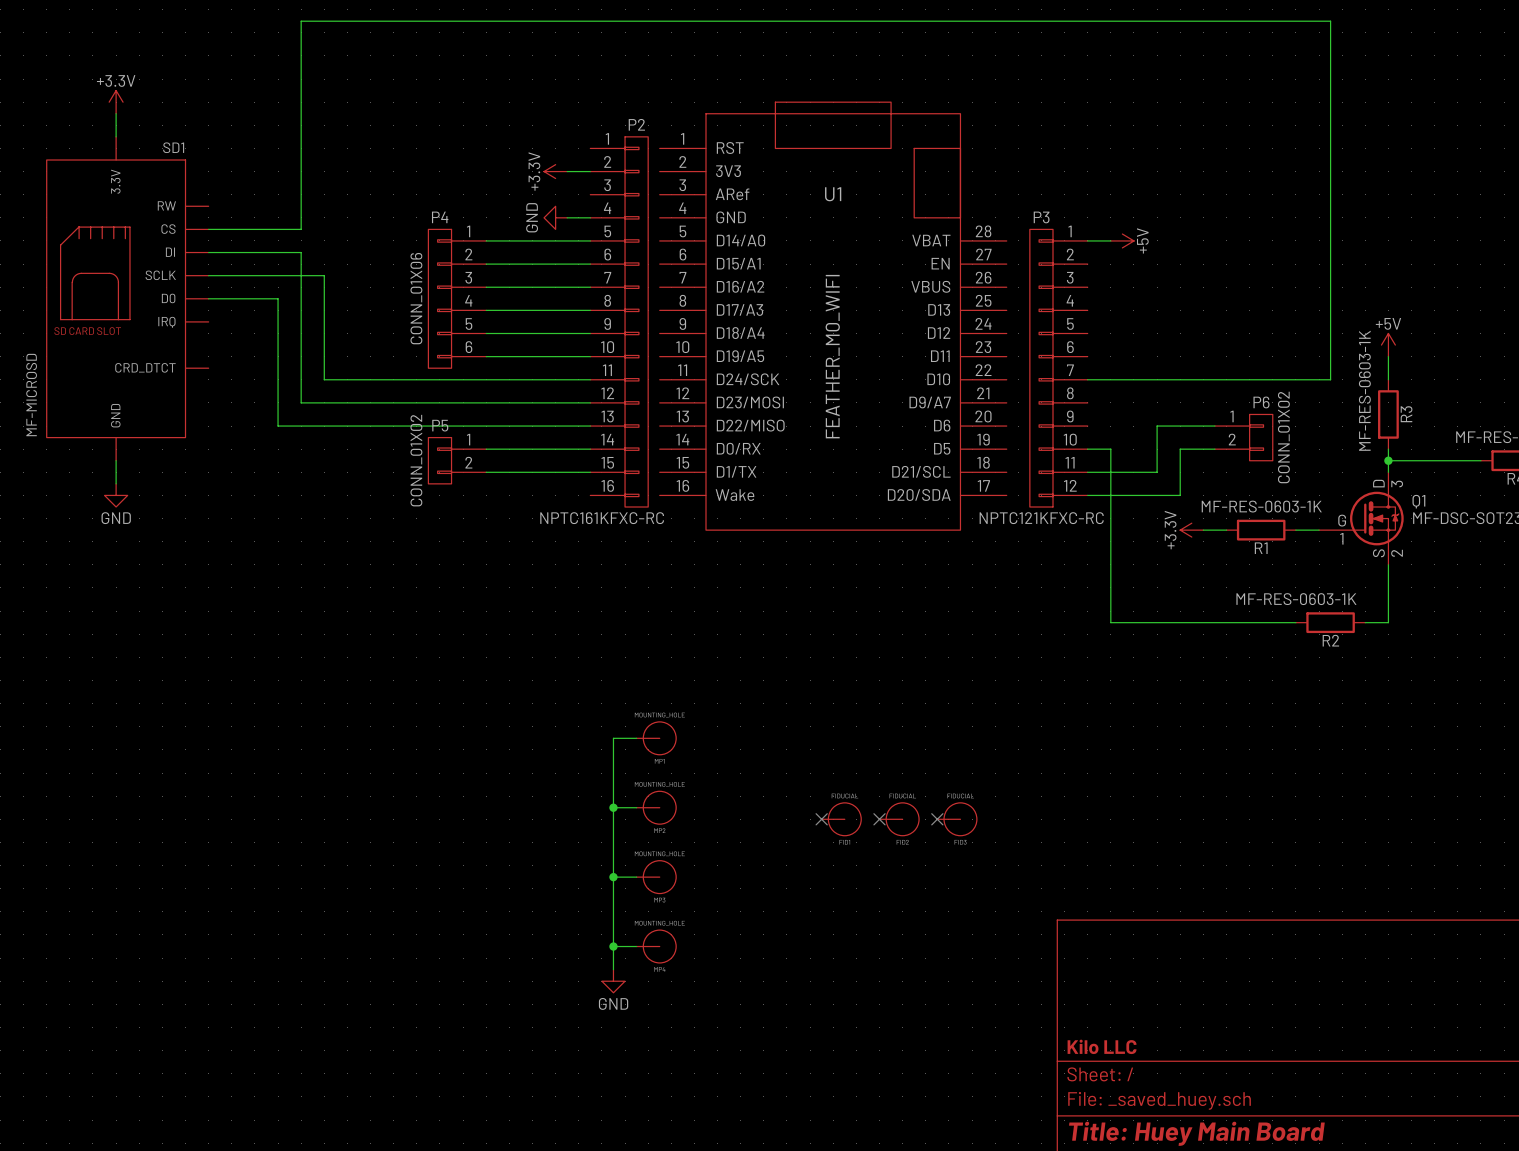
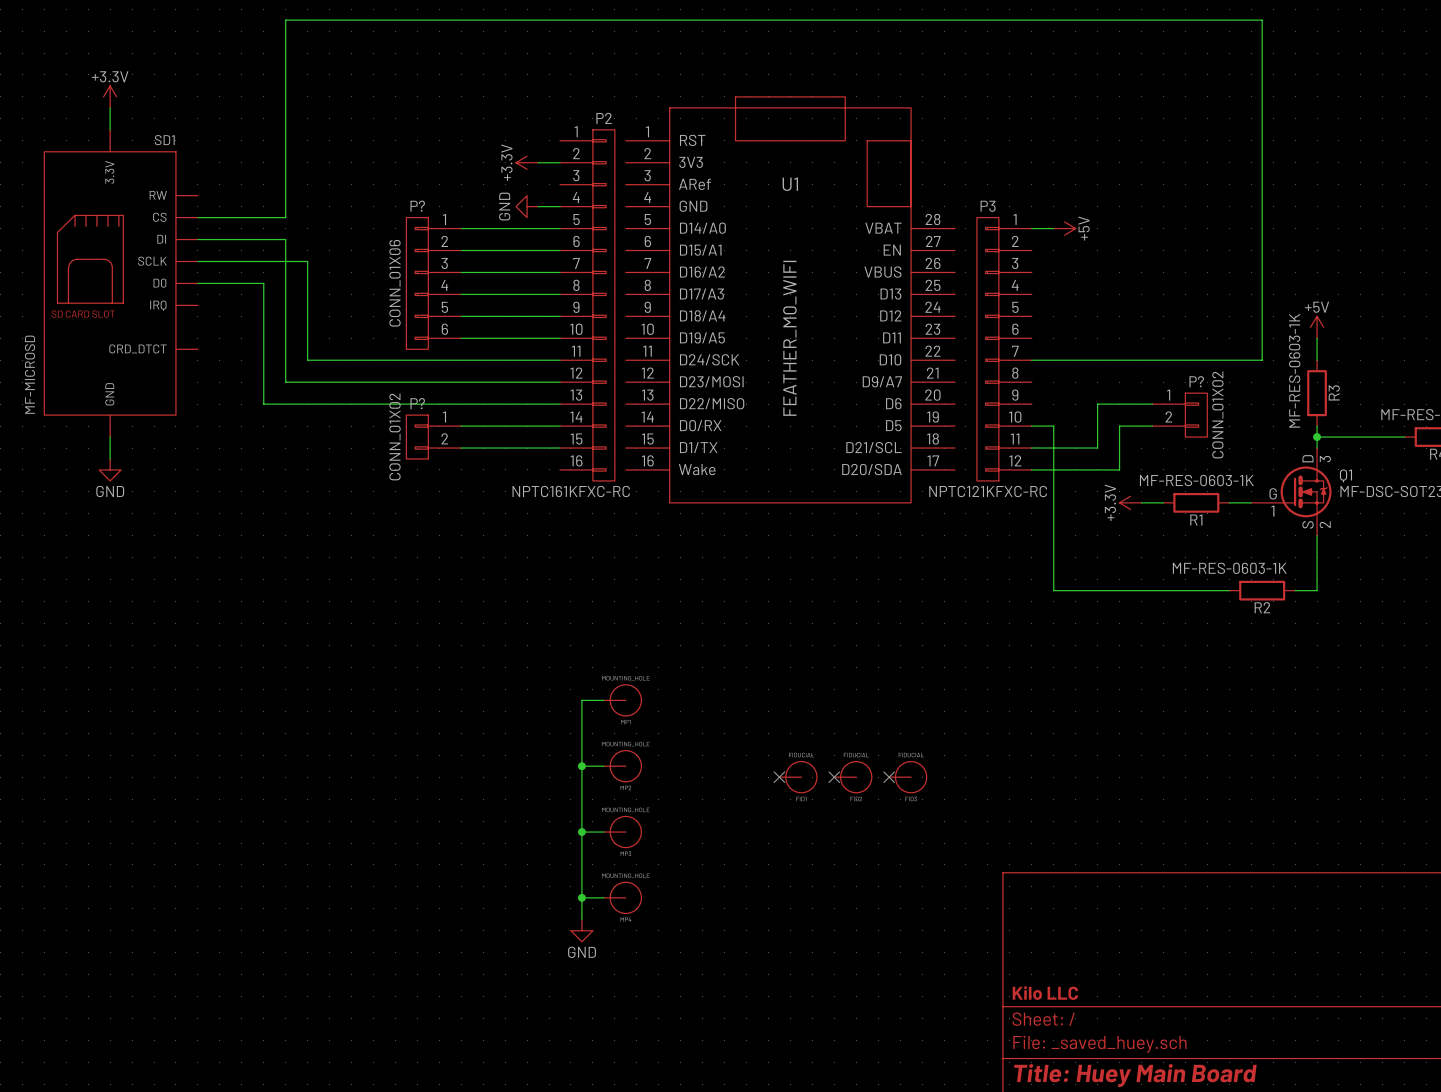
P4 name: P4 (440, 217) -> P? (417, 206)
P6 name: P6 (1261, 402) -> P? (1196, 381)
P5 name: P5 (440, 425) -> P? (417, 403)

